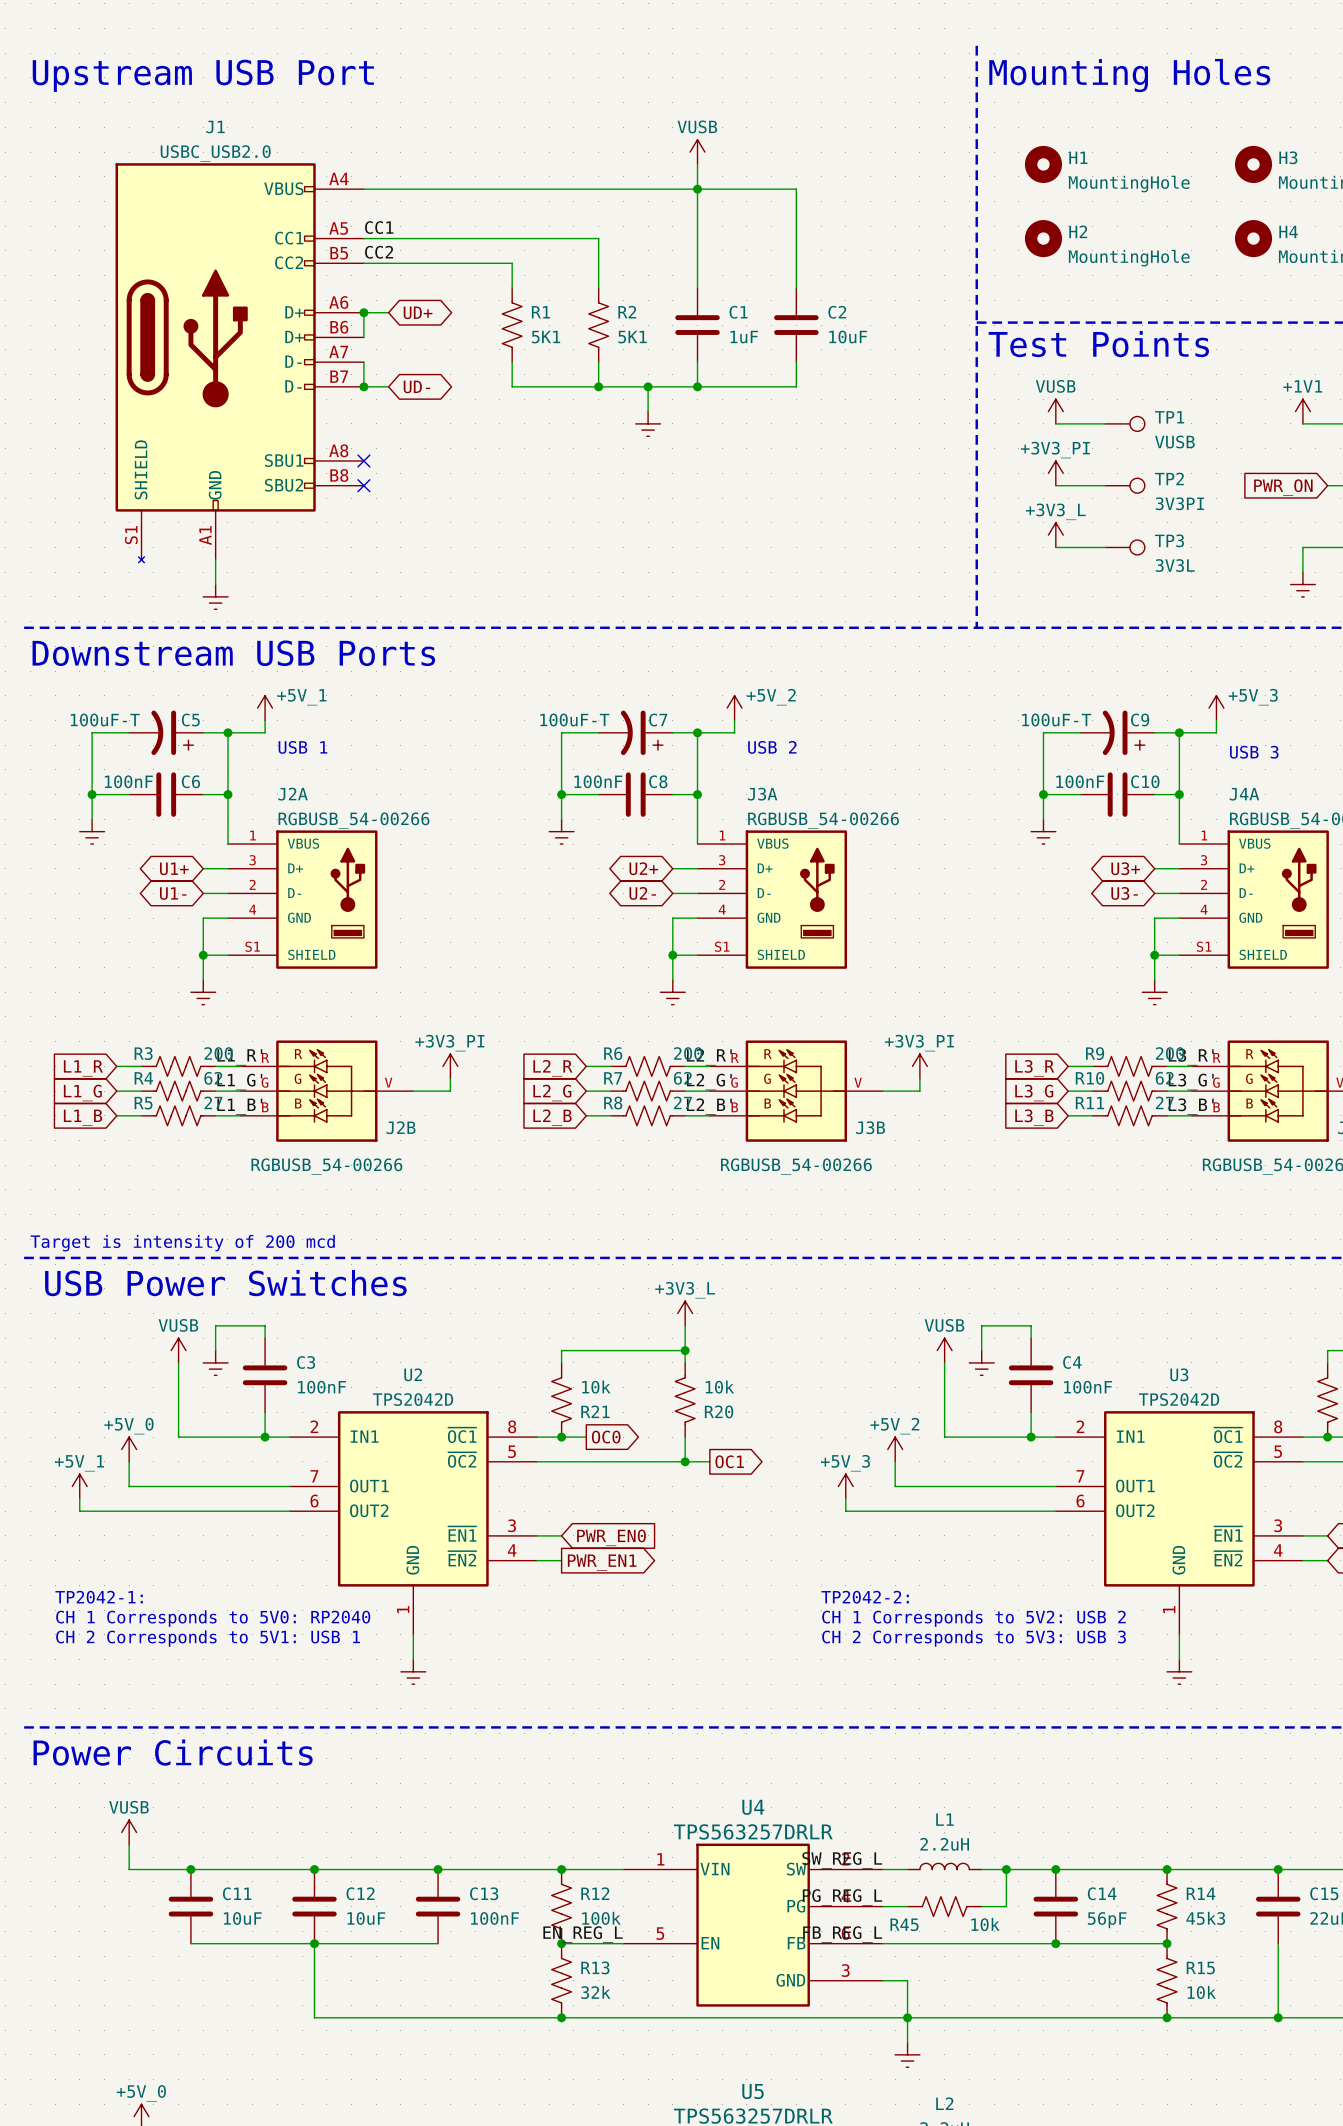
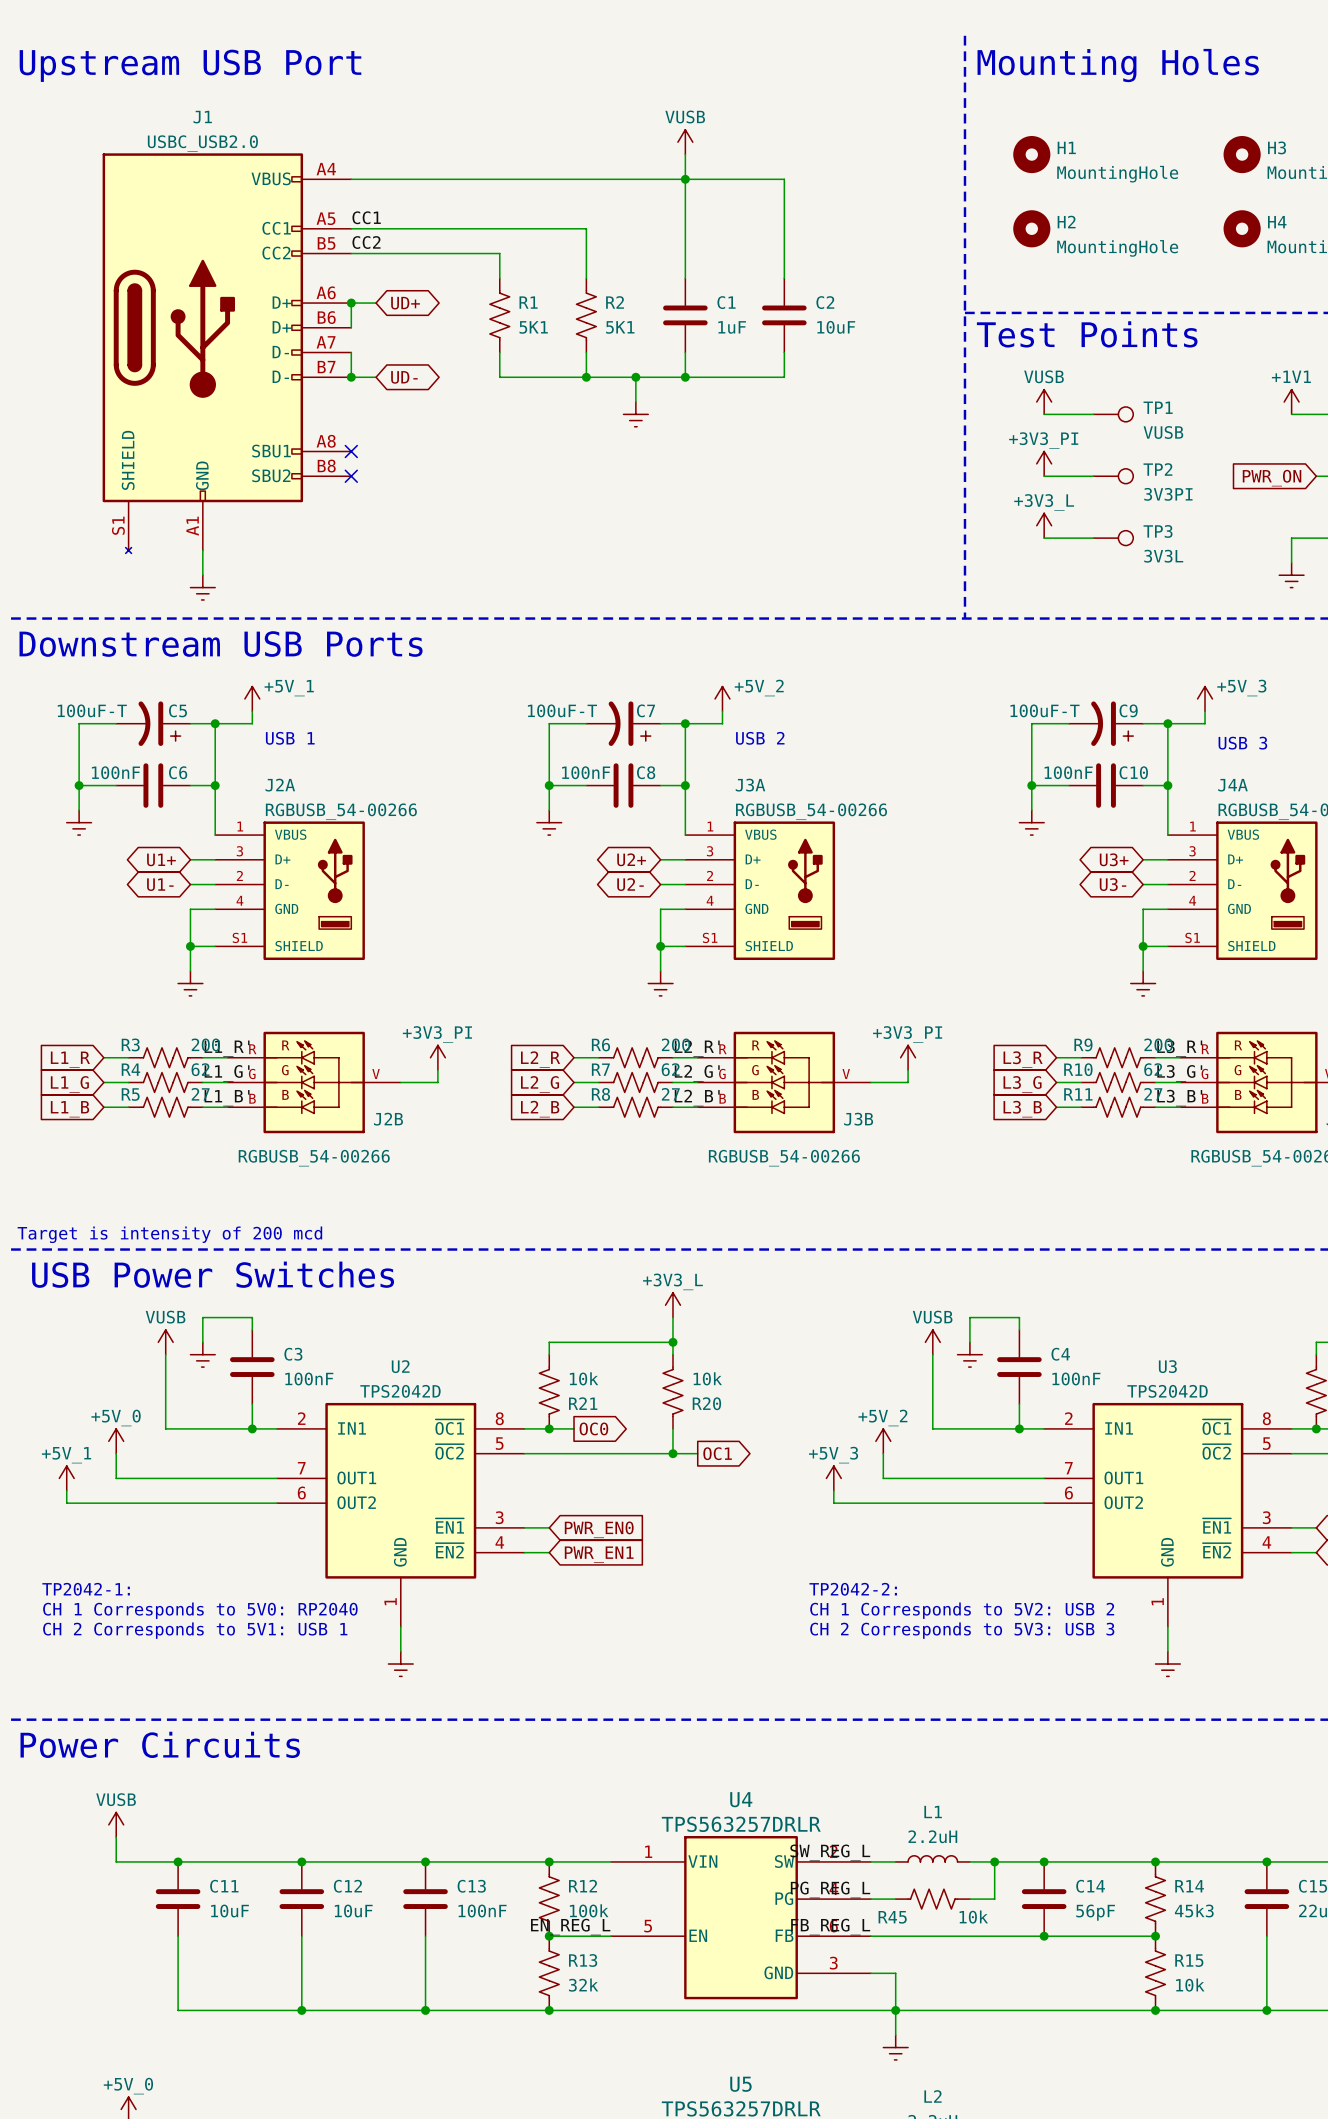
global label shape: output (602, 1562) -> input (599, 1554)
wire: (190, 1943) (438, 1943) -> (178, 1936) (178, 2010) (301, 2010)
junction: (314, 1943) -> none
wire: none -> (425, 1936) (425, 2010)
junction: none -> (301, 2010)
junction: none -> (425, 2010)

